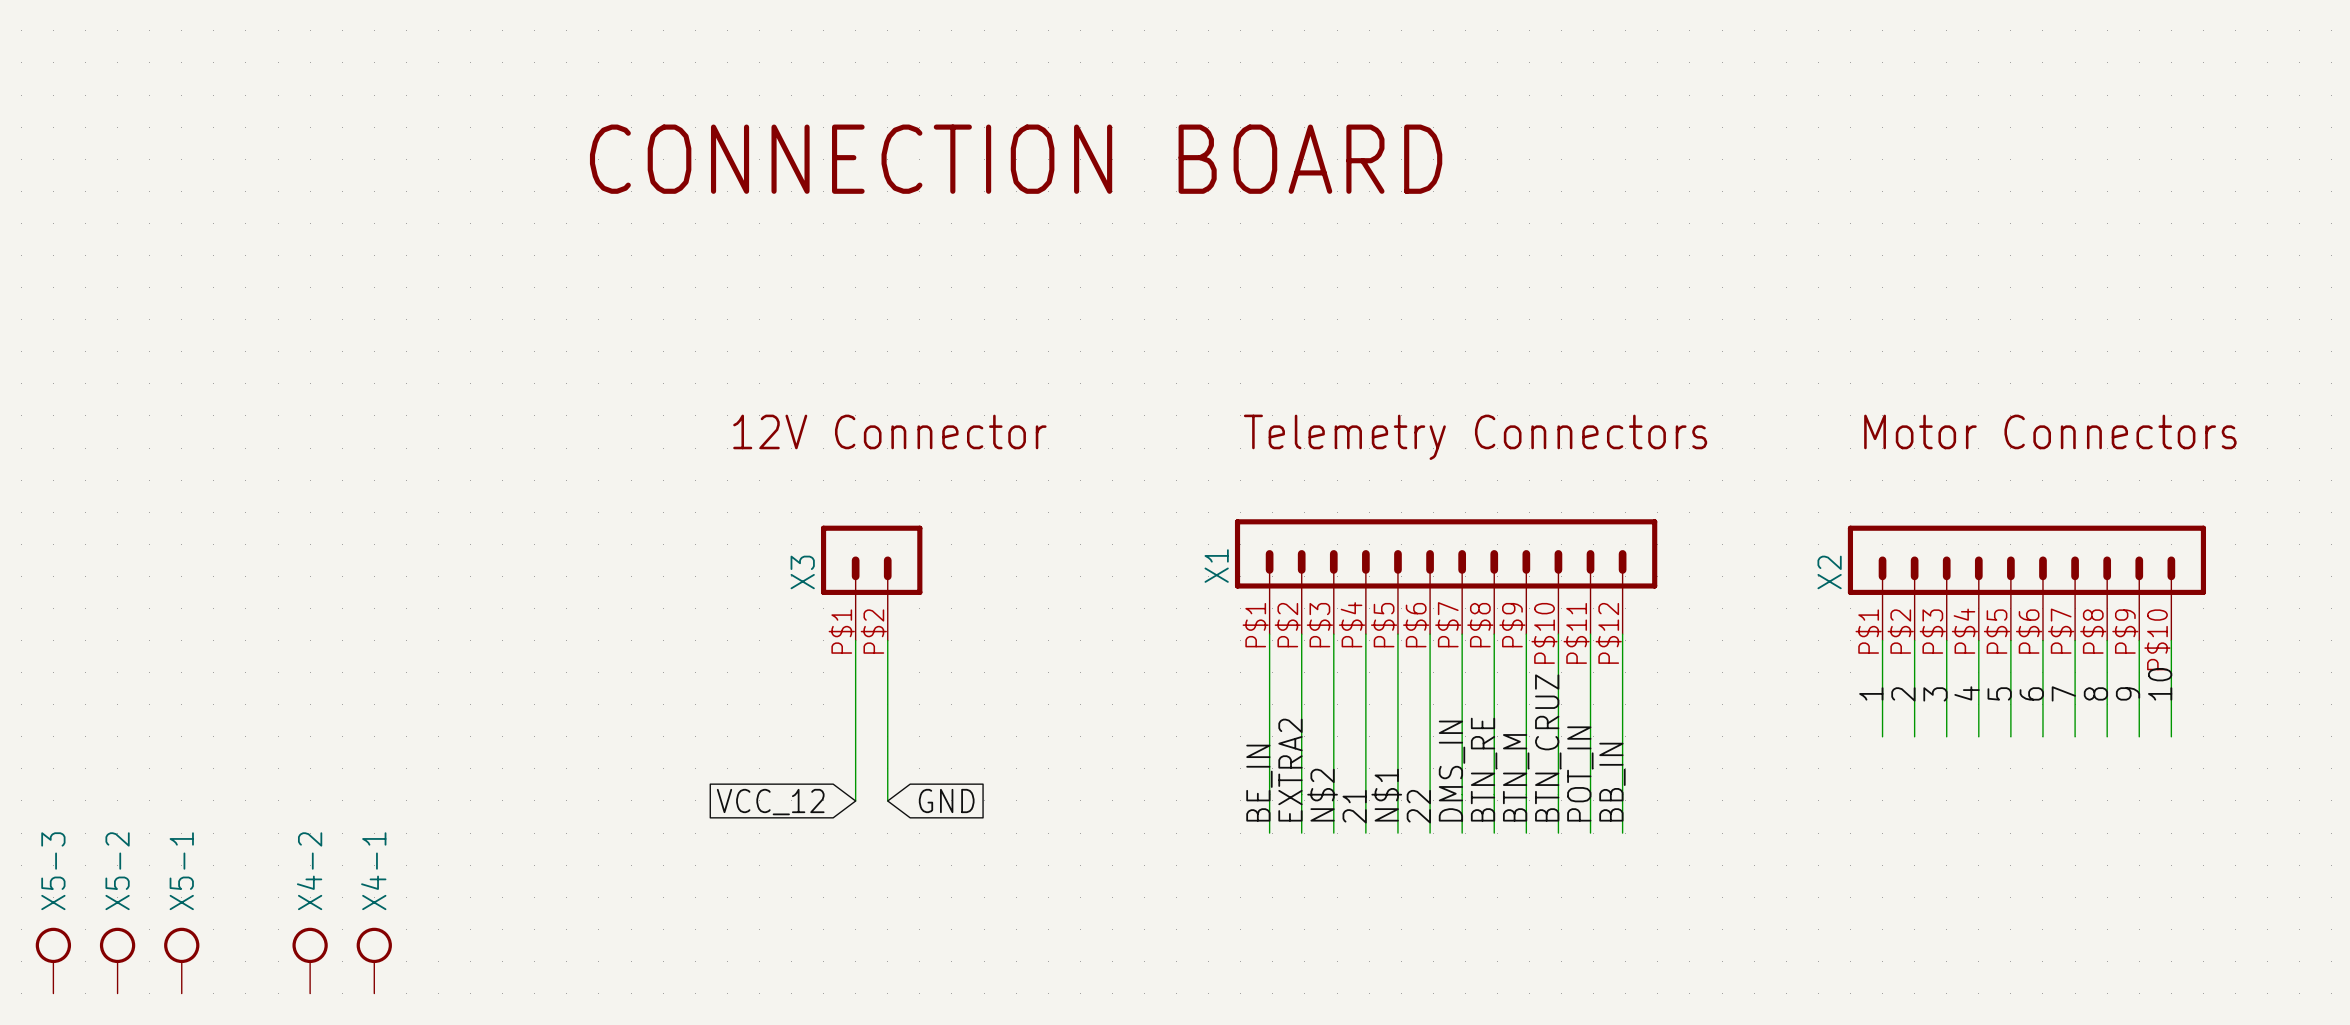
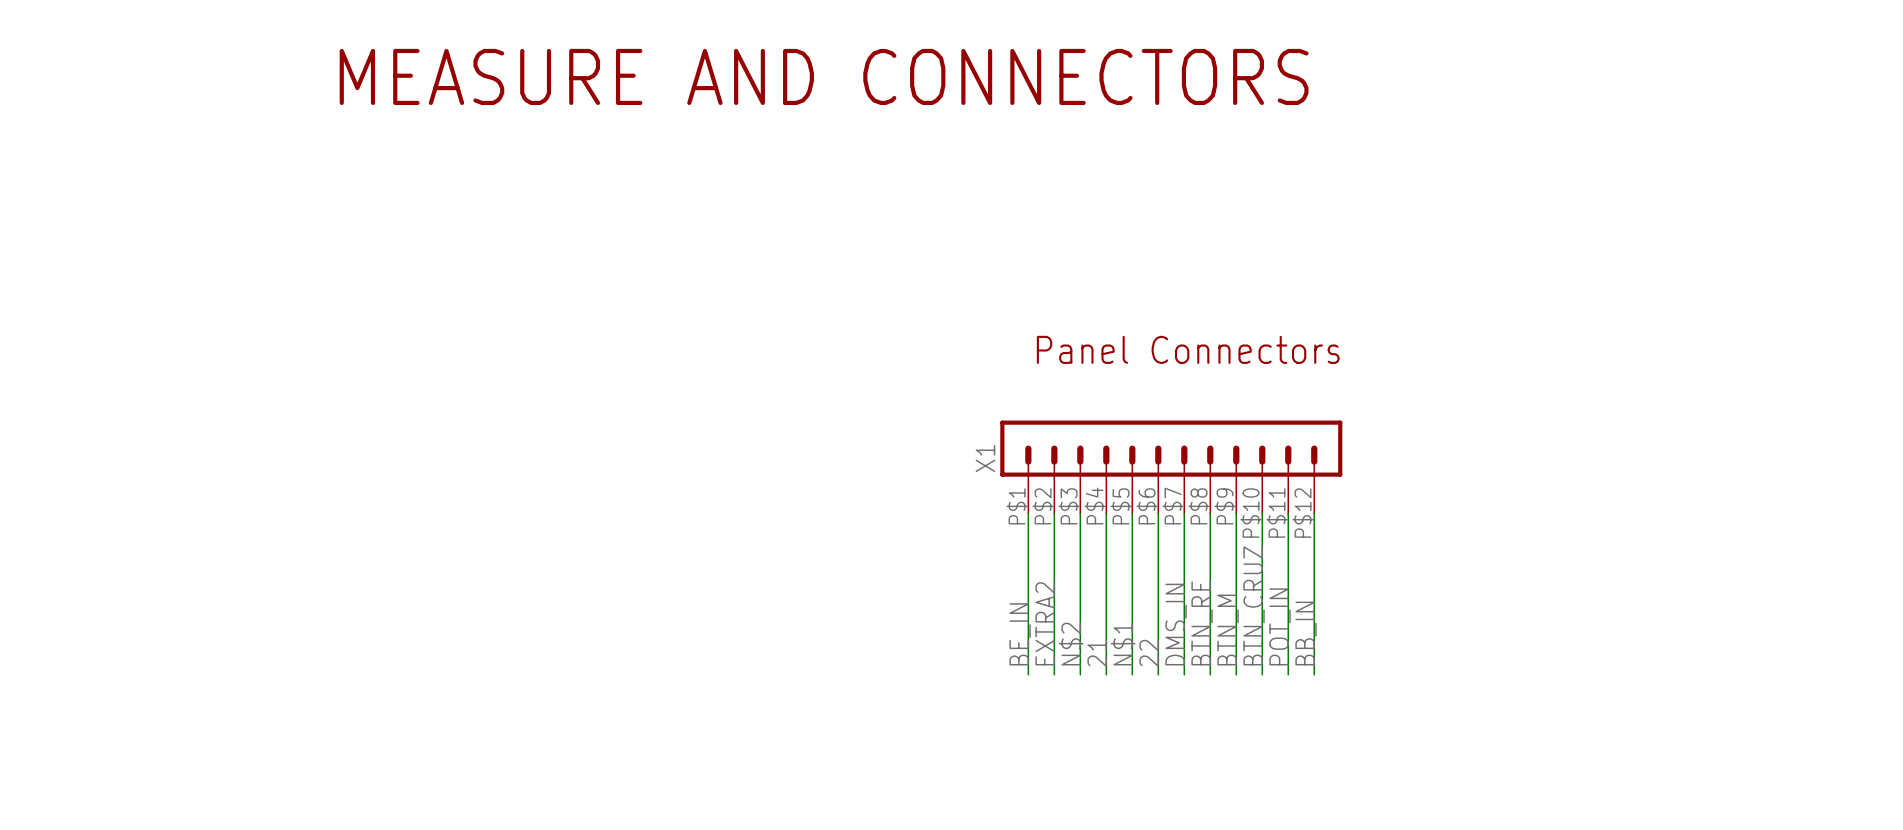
text: none -> MEASURE AND CONNECTORS (824, 76)
text: CONNECTION BOARD (1016, 159) -> none
text: 12V Connector (889, 431) -> none
text: Motor Connectors (2050, 431) -> none
text: Telemetry Connectors (1475, 437) -> Panel Connectors (1188, 349)
X3: (871, 583) -> none
X2: (2026, 583) -> none
wire: (855, 640) (855, 800) -> none
wire: (887, 640) (887, 800) -> none
wire: (1882, 640) (1882, 736) -> none
wire: (1914, 640) (1914, 736) -> none
wire: (1946, 640) (1946, 736) -> none
wire: (1978, 640) (1978, 736) -> none
wire: (2010, 640) (2010, 736) -> none
wire: (2042, 640) (2042, 736) -> none
wire: (2075, 640) (2075, 736) -> none
wire: (2107, 640) (2107, 736) -> none
wire: (2139, 640) (2139, 736) -> none
wire: (2171, 640) (2171, 736) -> none
label: 10 (2160, 684) -> none
label: 1 (1871, 693) -> none
label: 4 (1967, 693) -> none
label: 5 (1999, 693) -> none
label: 6 (2031, 693) -> none
label: 7 (2063, 693) -> none
label: 8 (2095, 693) -> none
label: 9 (2128, 693) -> none
label: 2 (1903, 694) -> none
label: 3 (1935, 694) -> none
global label: GND (946, 800) -> none
global label: VCC_12 (770, 802) -> none
X5-3: (53, 960) -> none
X5-2: (117, 960) -> none
X5-1: (181, 960) -> none
X4-2: (310, 960) -> none
X4-1: (374, 960) -> none

